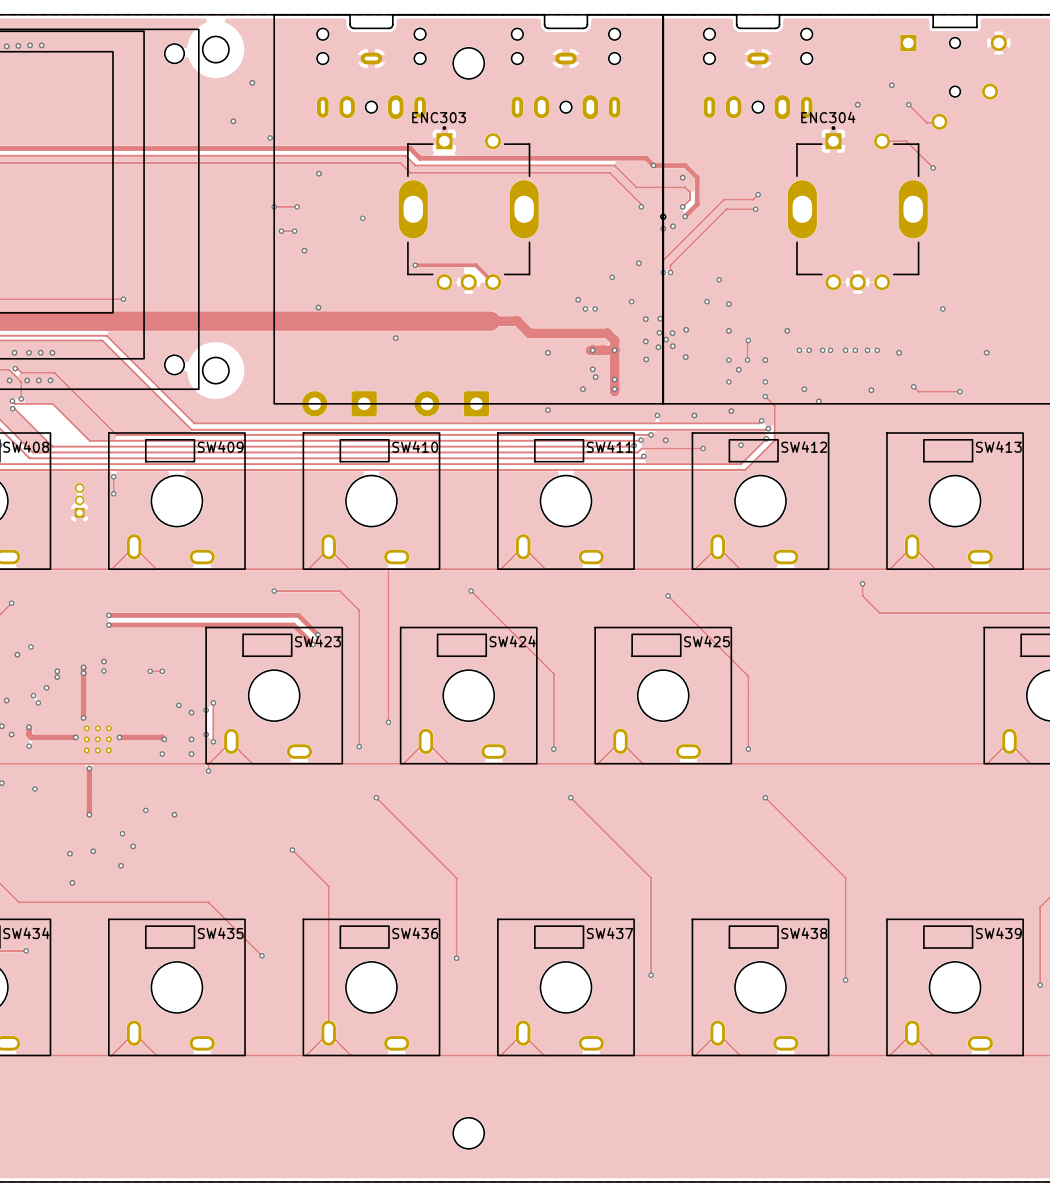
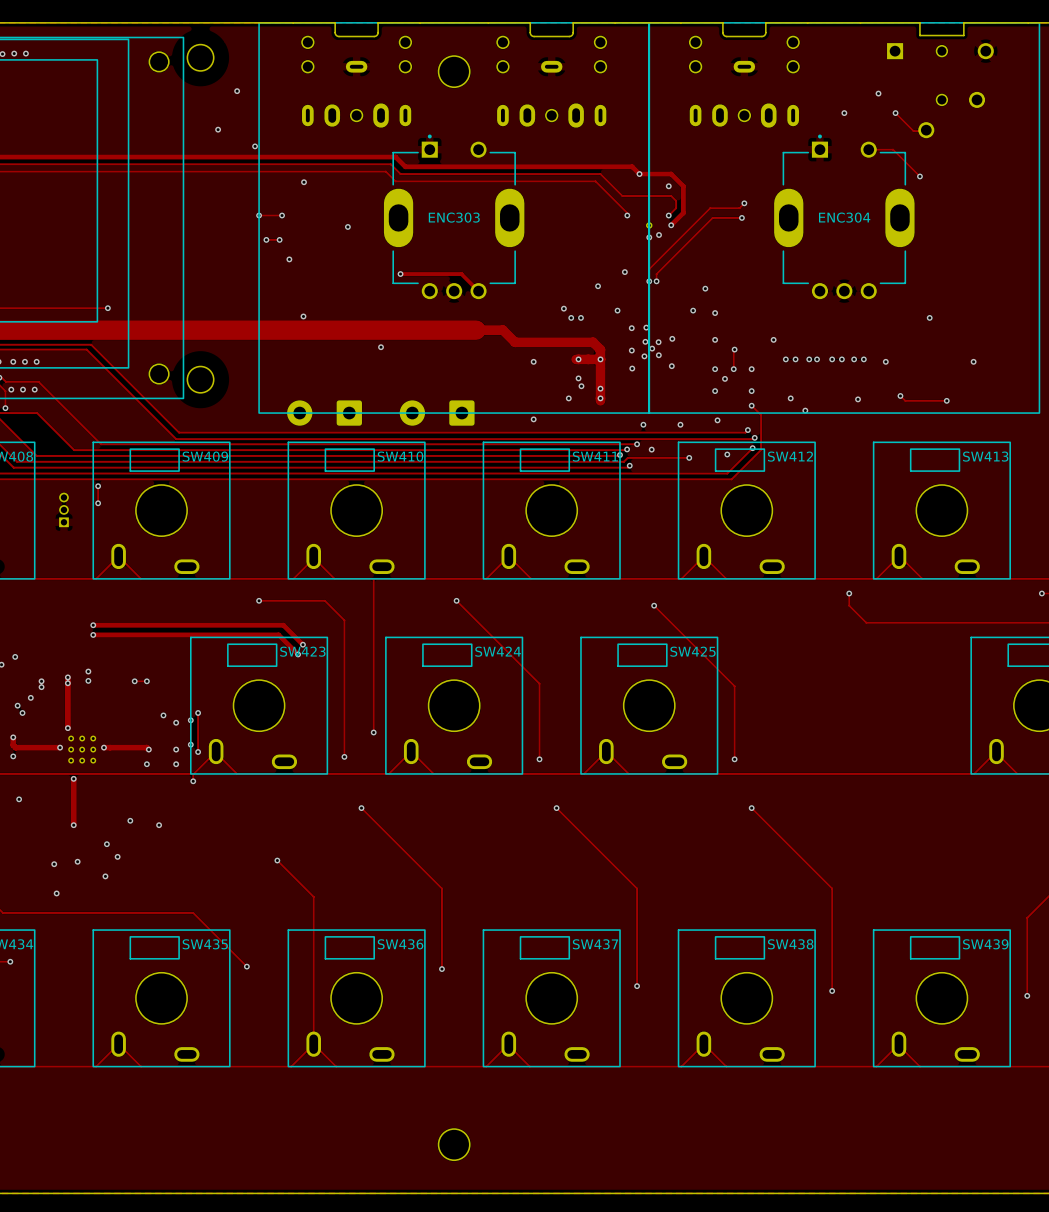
ENC303 name position: ENC303 (439, 117) -> ENC303 (454, 217)
ENC304 name position: ENC304 (828, 117) -> ENC304 (844, 217)

